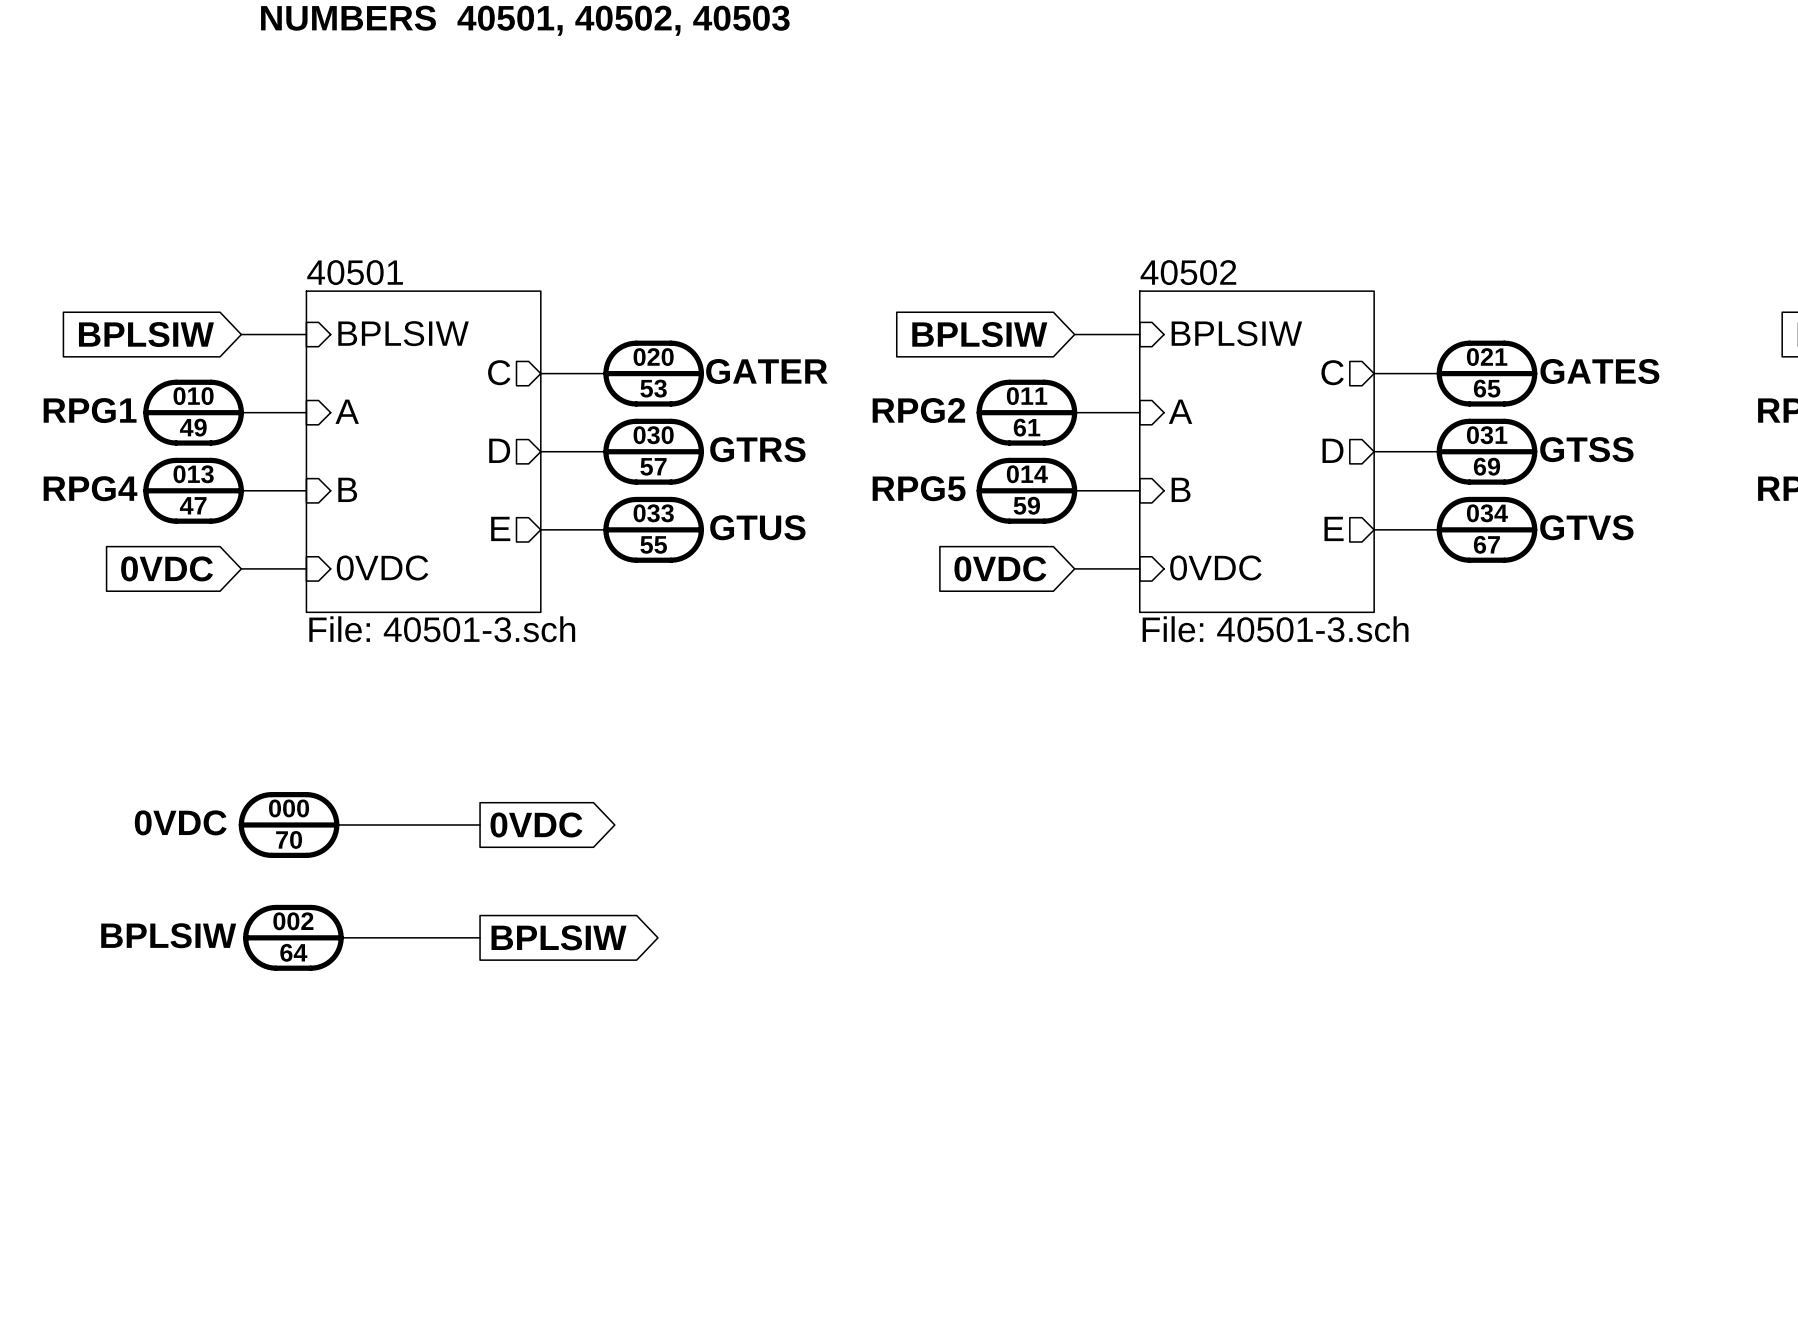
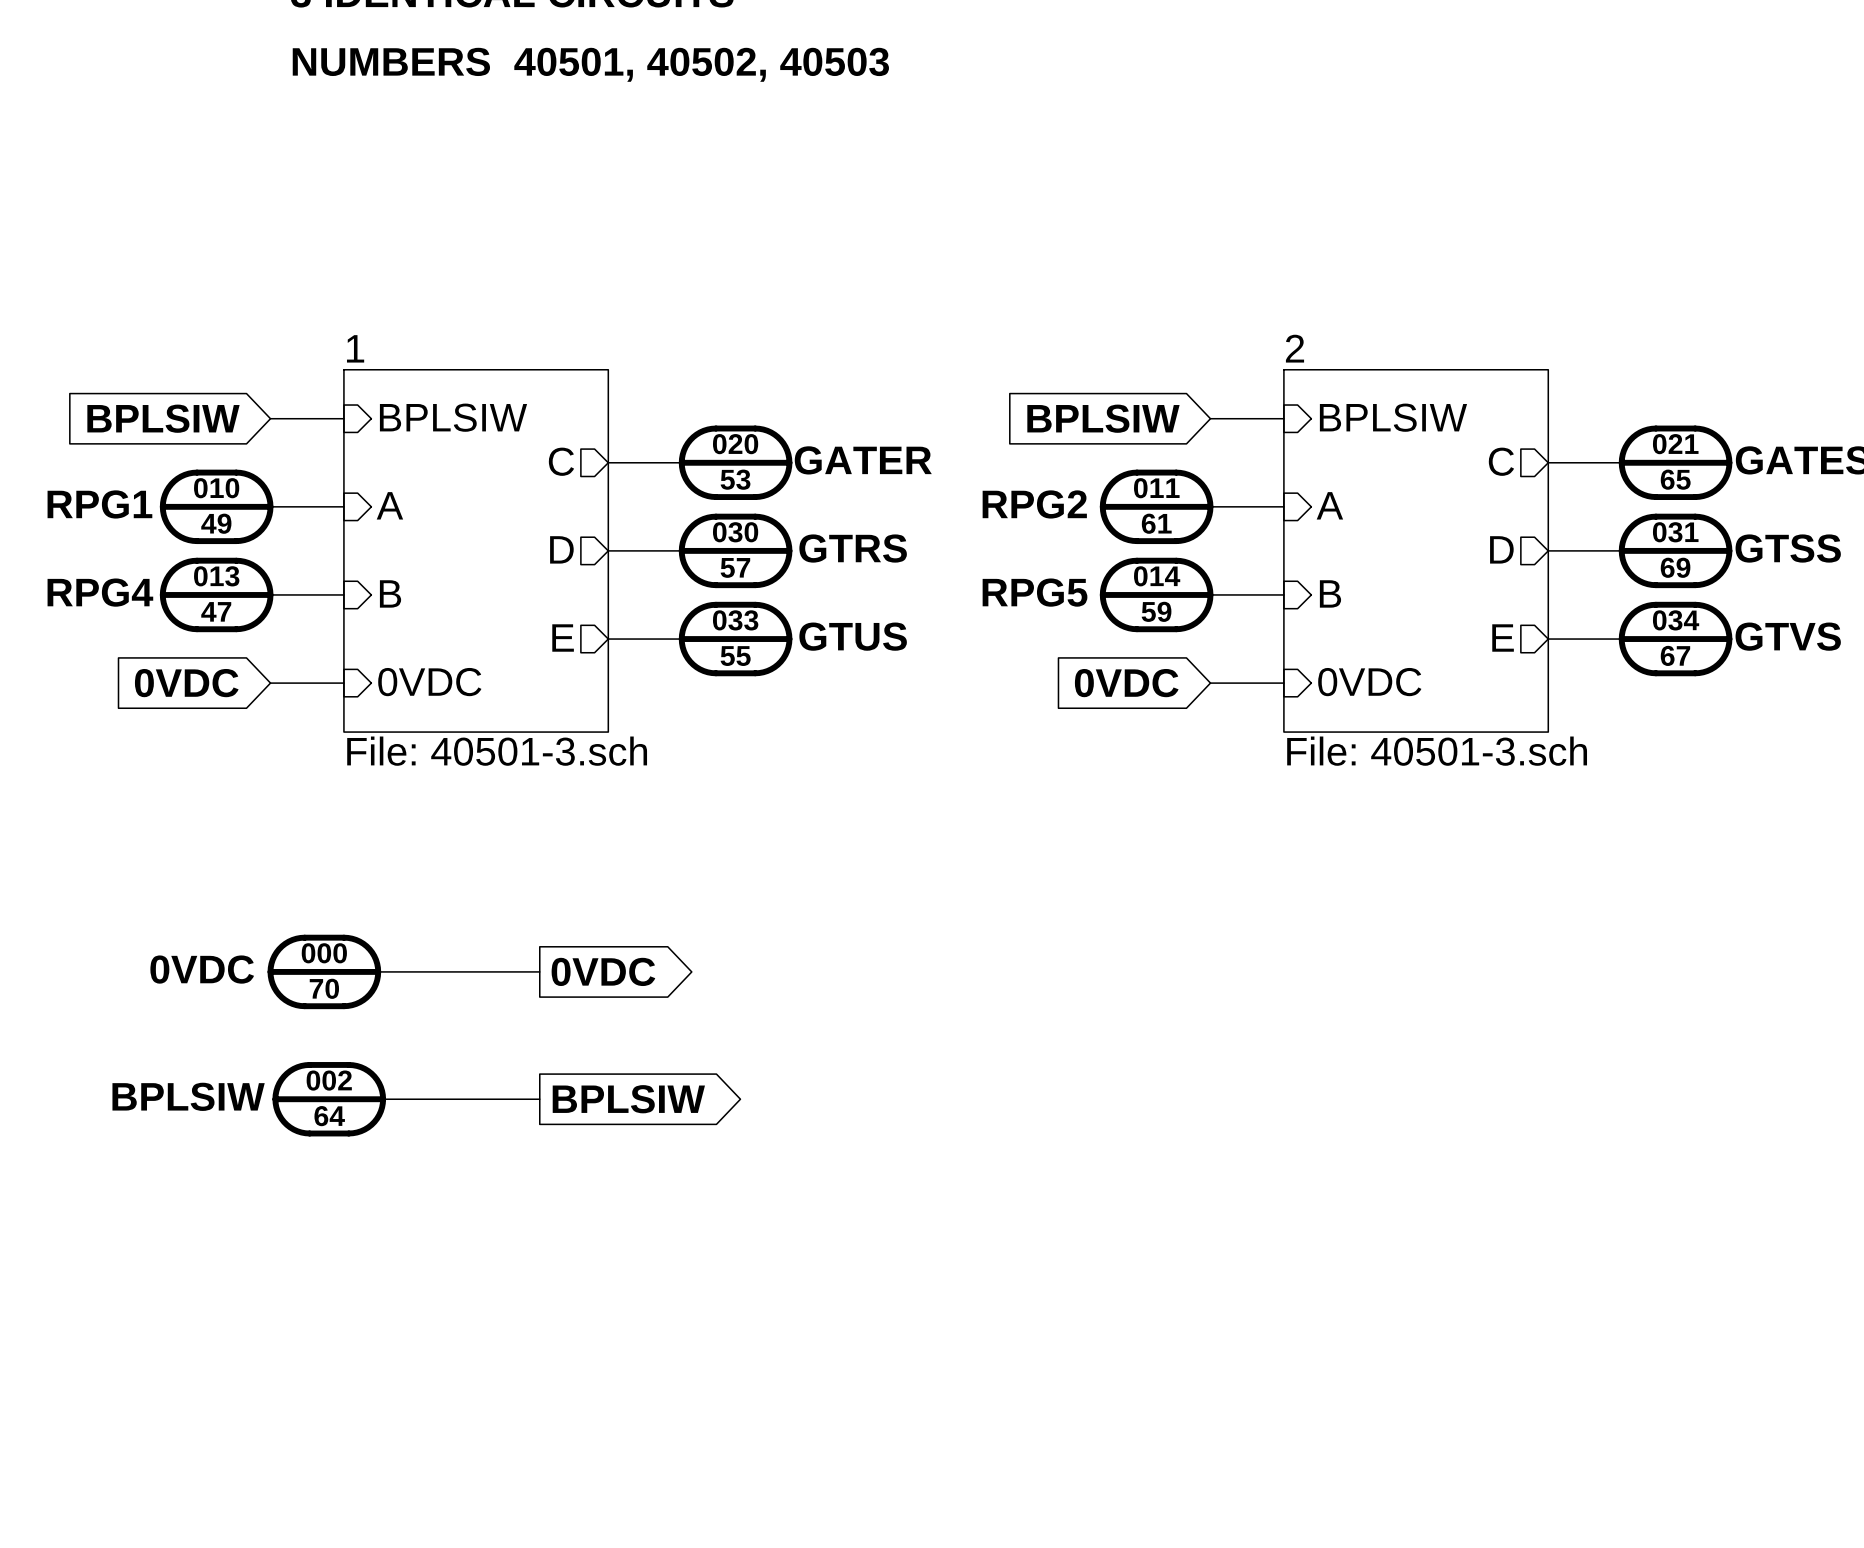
sheet 40501 name: 40501 (355, 272) -> 1 (355, 348)
sheet 40502 name: 40502 (1188, 272) -> 2 (1295, 348)

